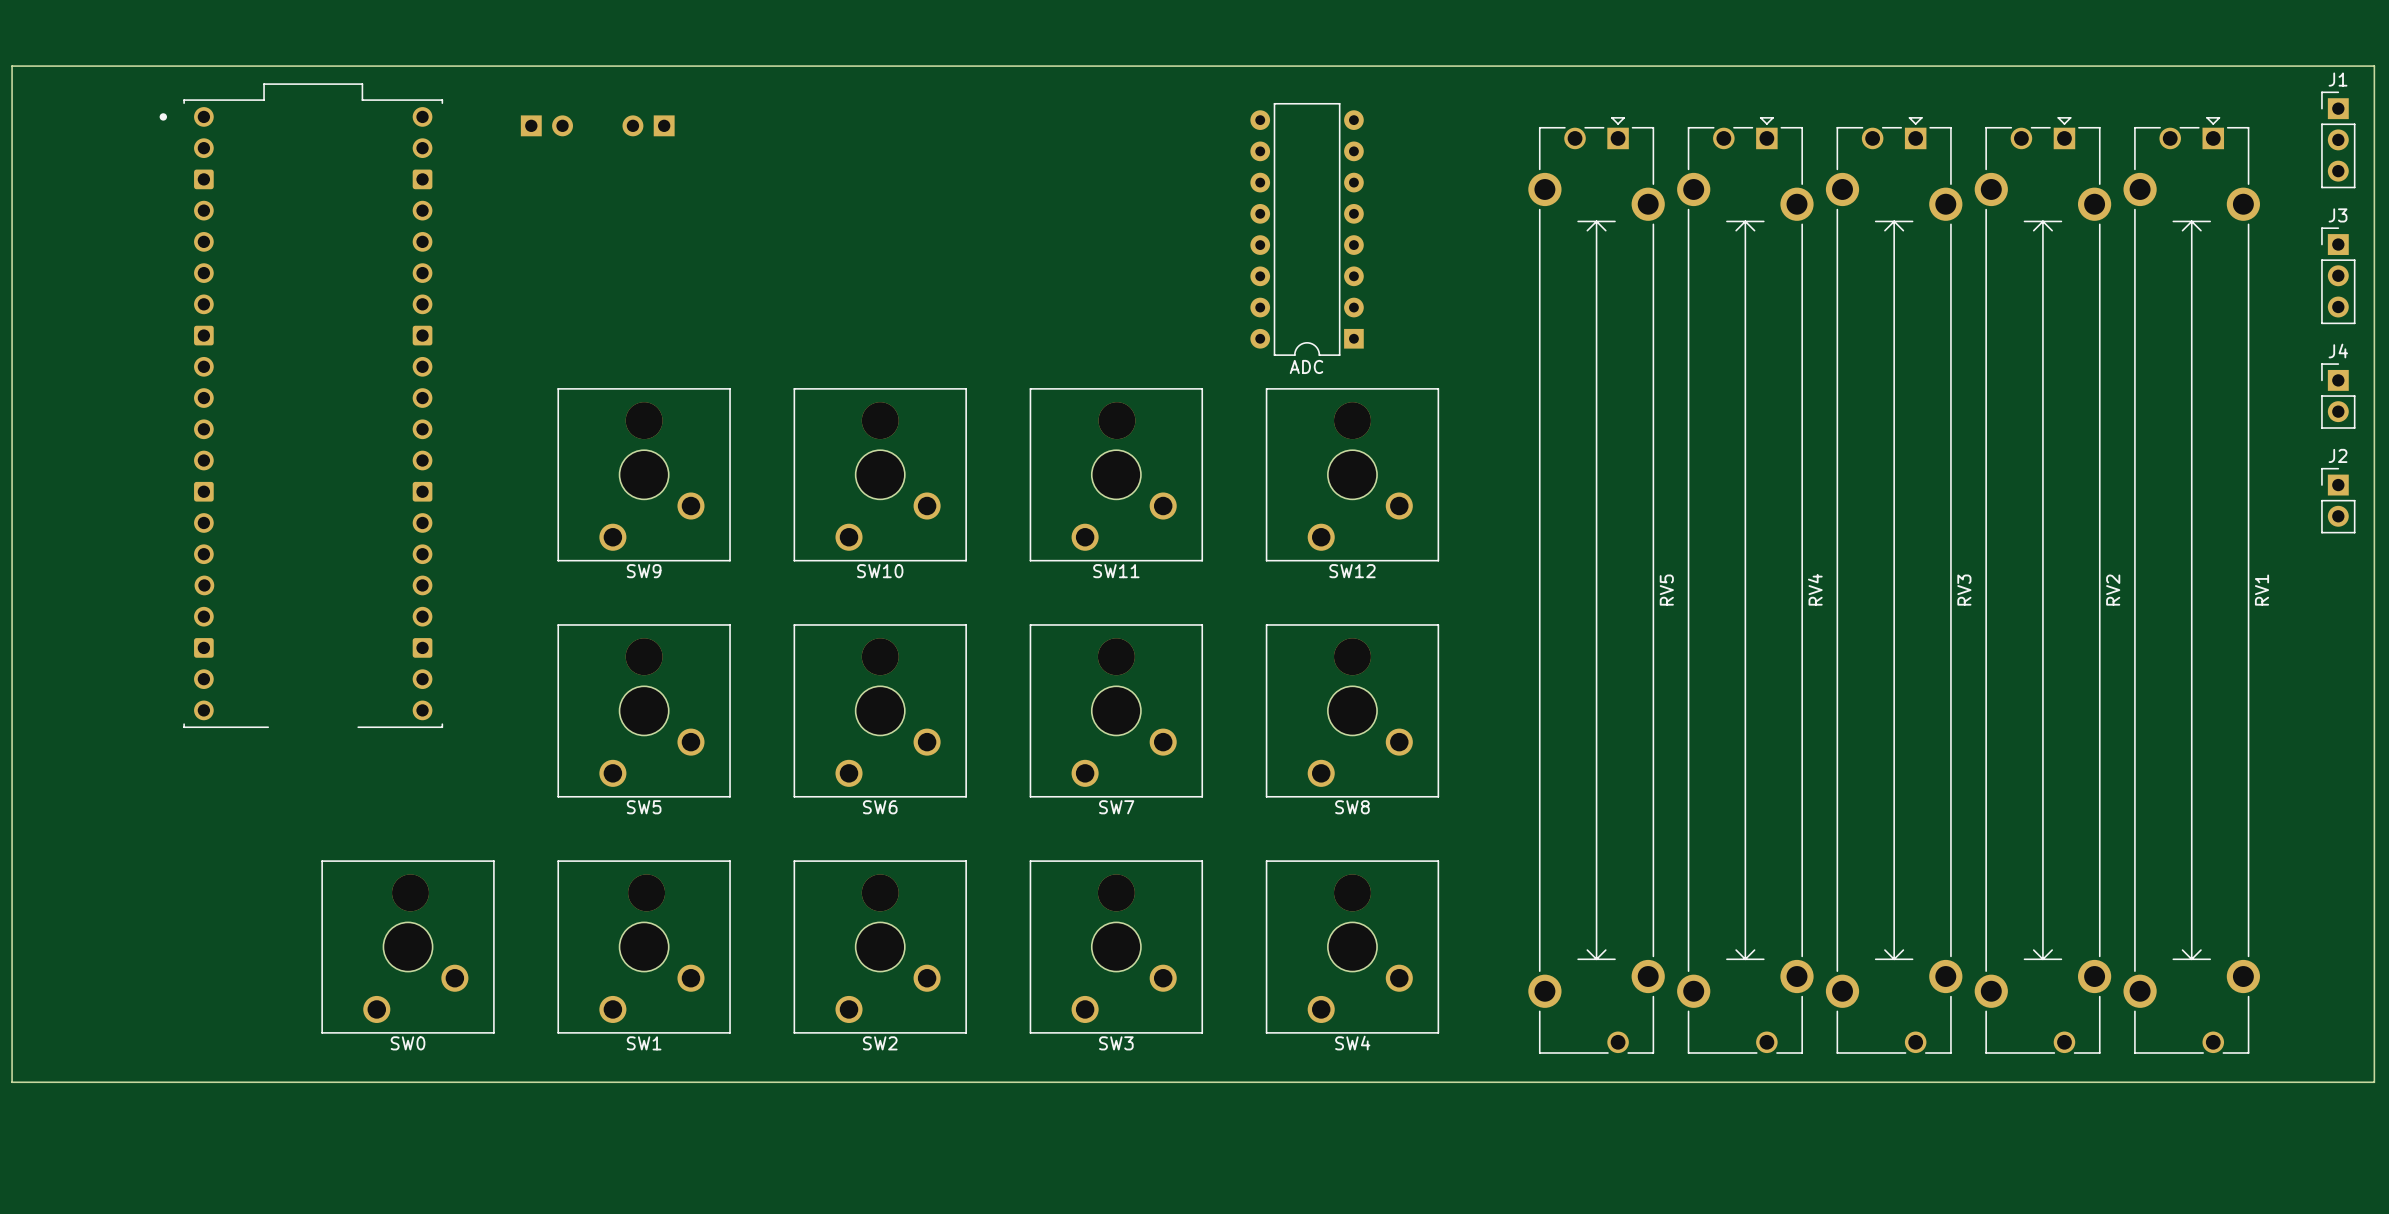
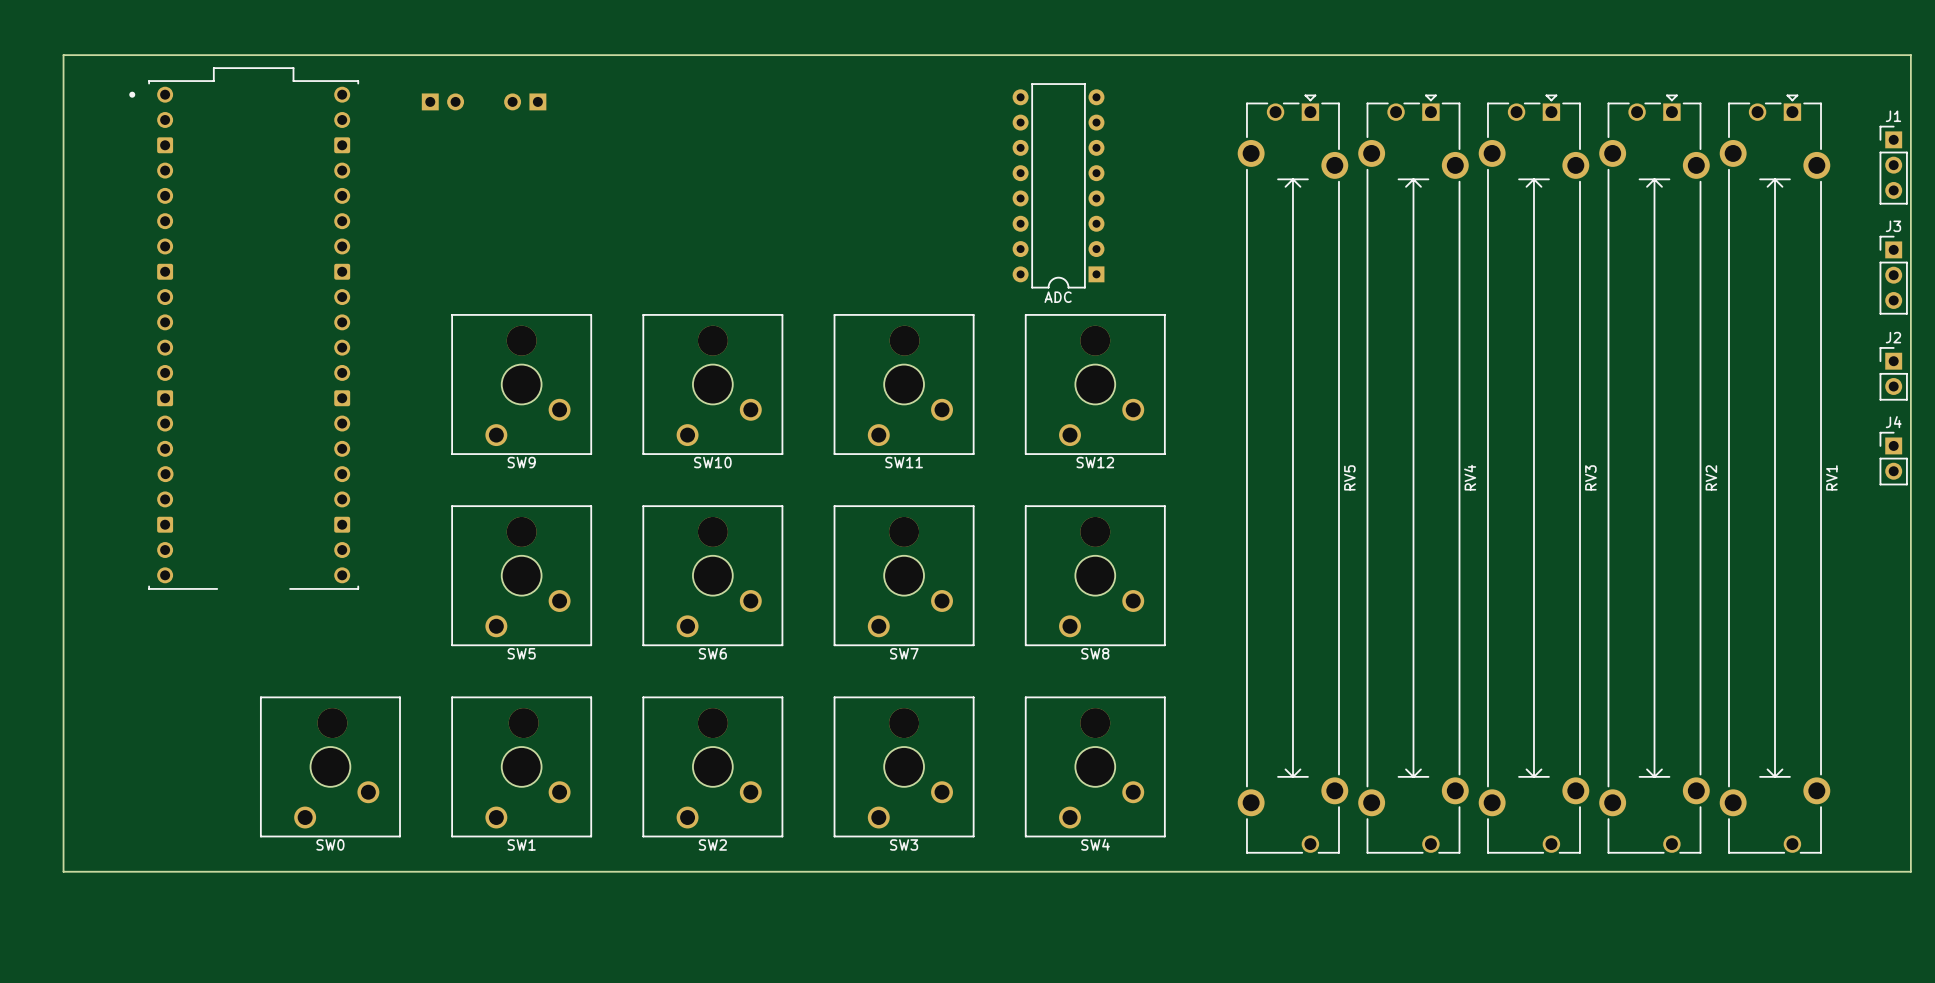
board edge: (12, 66) (2374, 66) (2374, 1082) (12, 1082) (12, 66) -> (63, 55) (63, 871) (1910, 871) (1910, 55) (63, 55)
J1 position: (2338, 139) -> (1893, 165)
J3 position: (2338, 275) -> (1893, 275)
J4 position: (2338, 396) -> (1893, 458)
J2 position: (2338, 500) -> (1893, 373)

